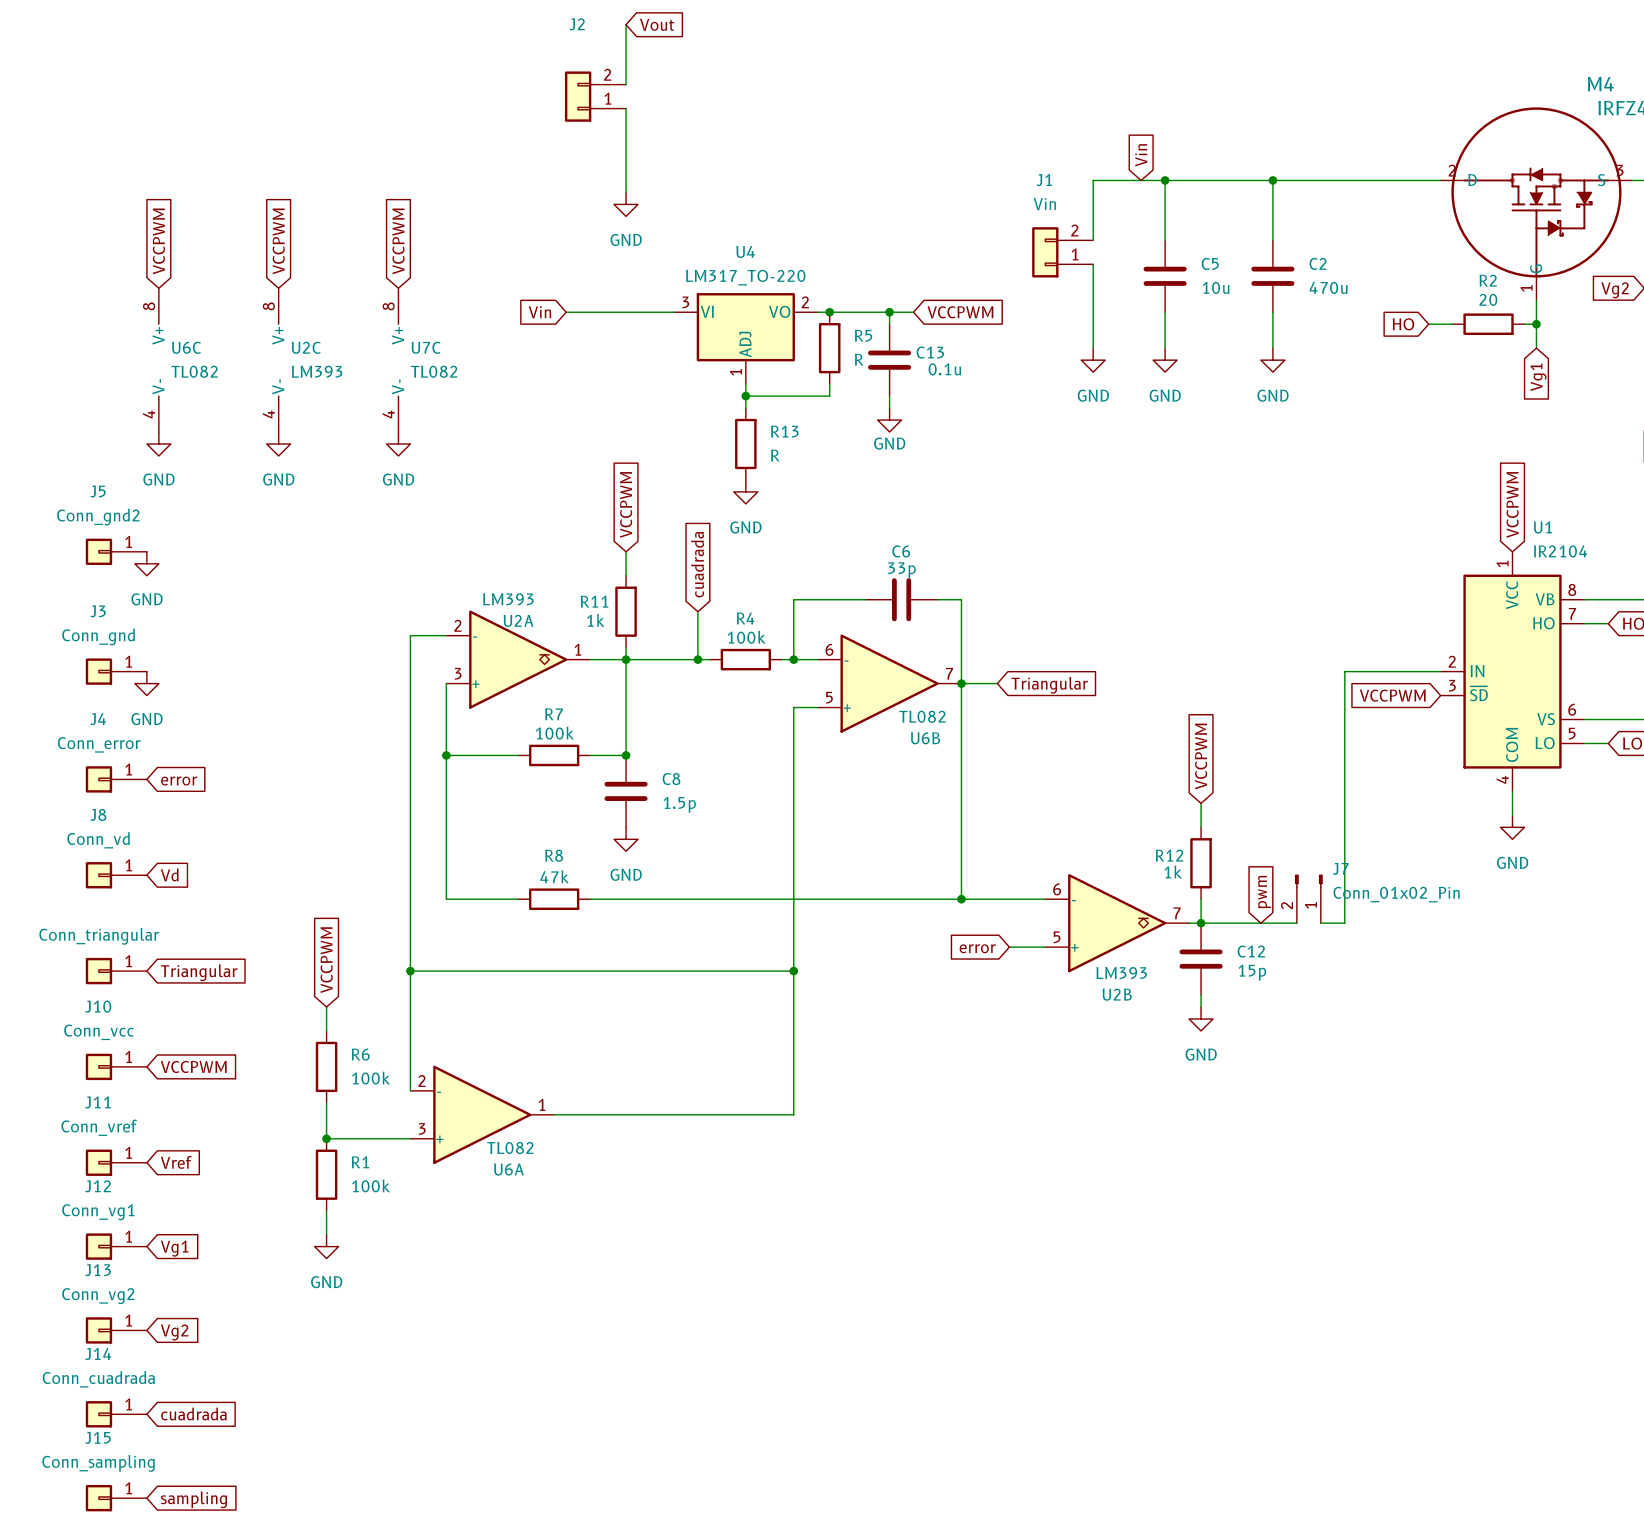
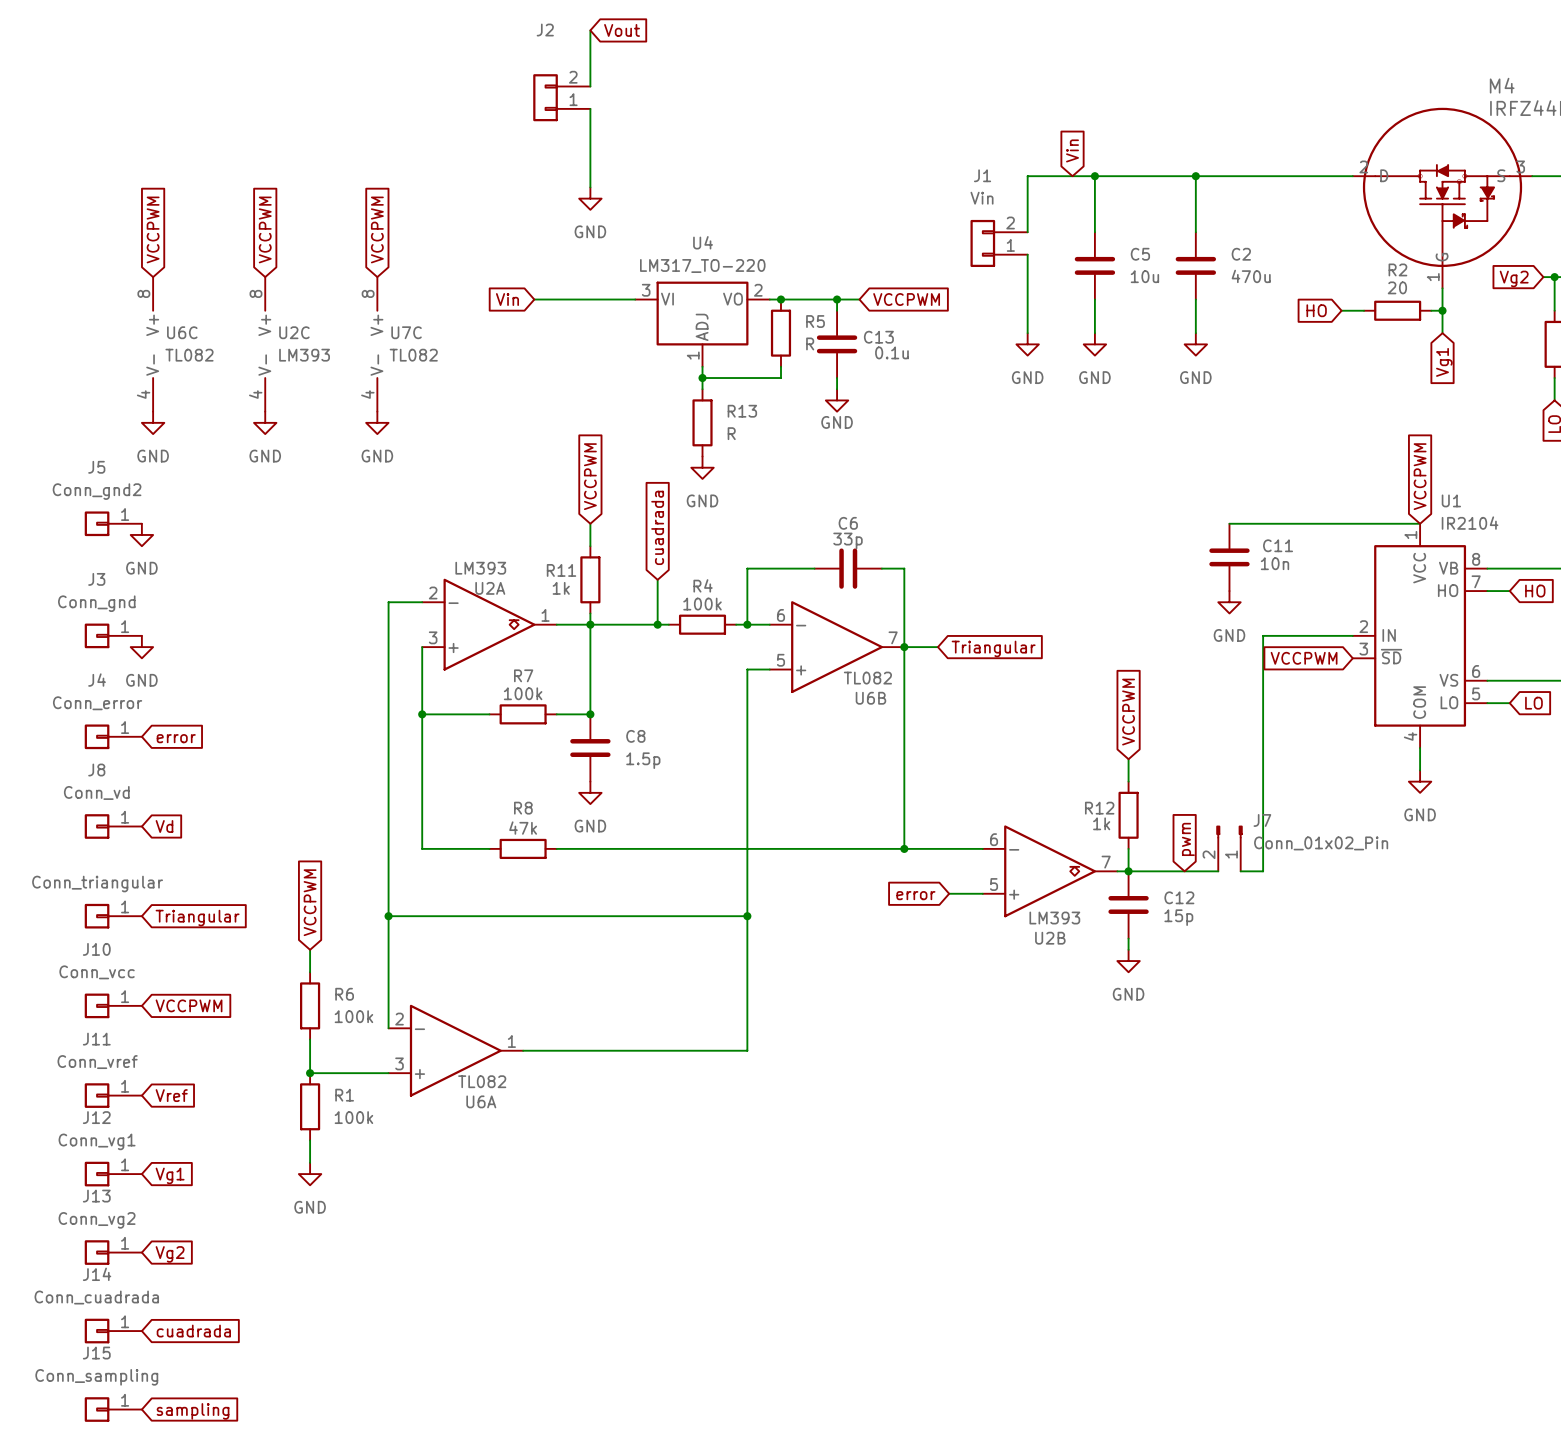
wire: none -> (1229, 523) (1420, 523)
C11: none -> 10n (1229, 557)
power symbol: none -> GND (1229, 602)

